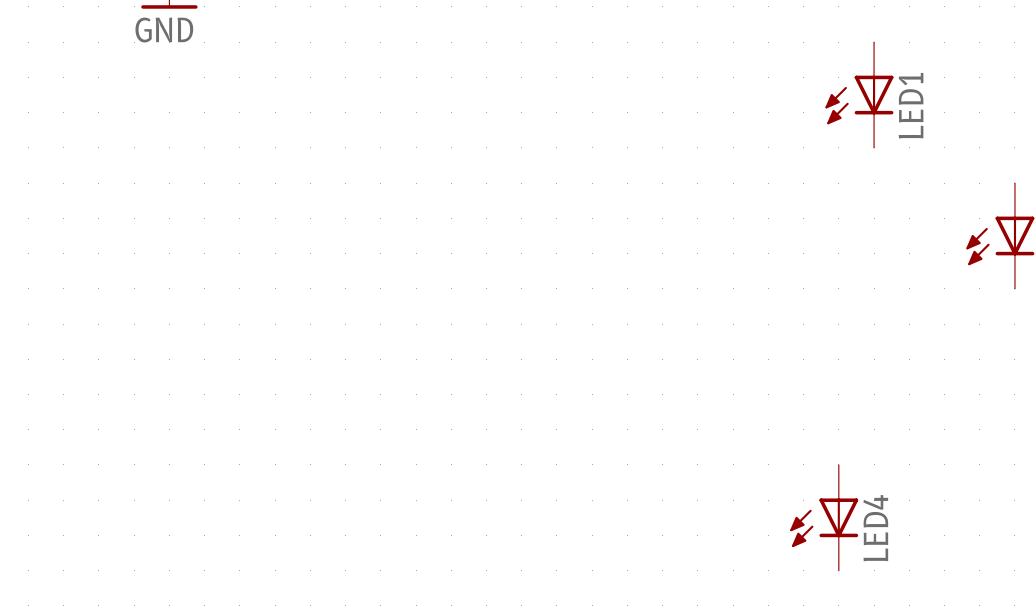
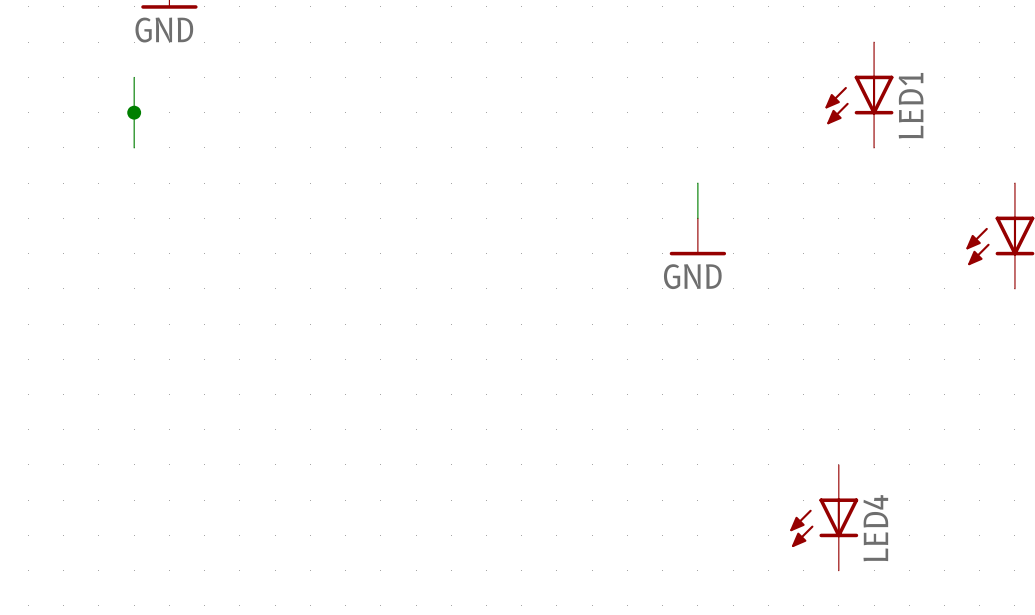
wire: none -> (134, 77) (134, 147)
junction: none -> (134, 112)
wire: none -> (697, 183) (697, 218)
power symbol: none -> GND (697, 236)

